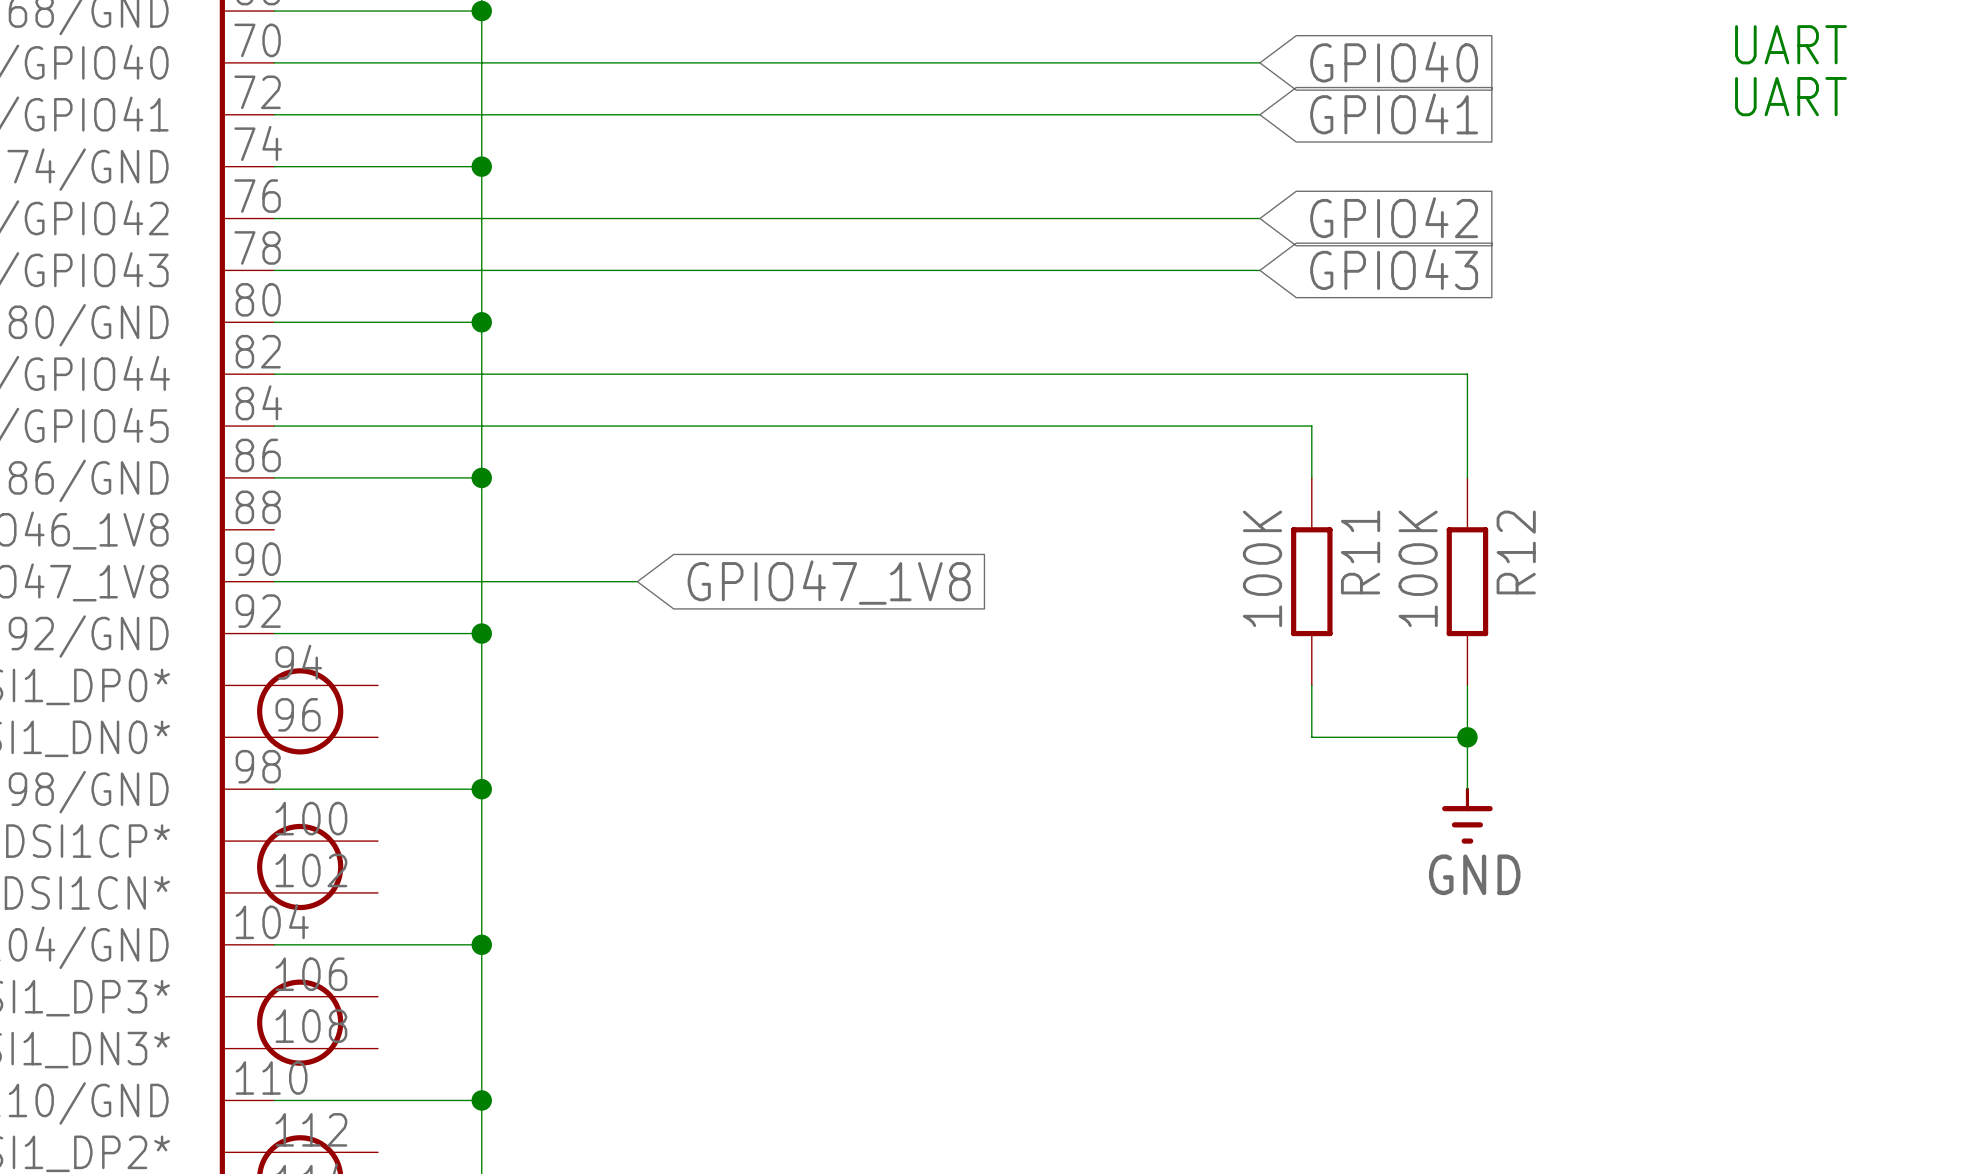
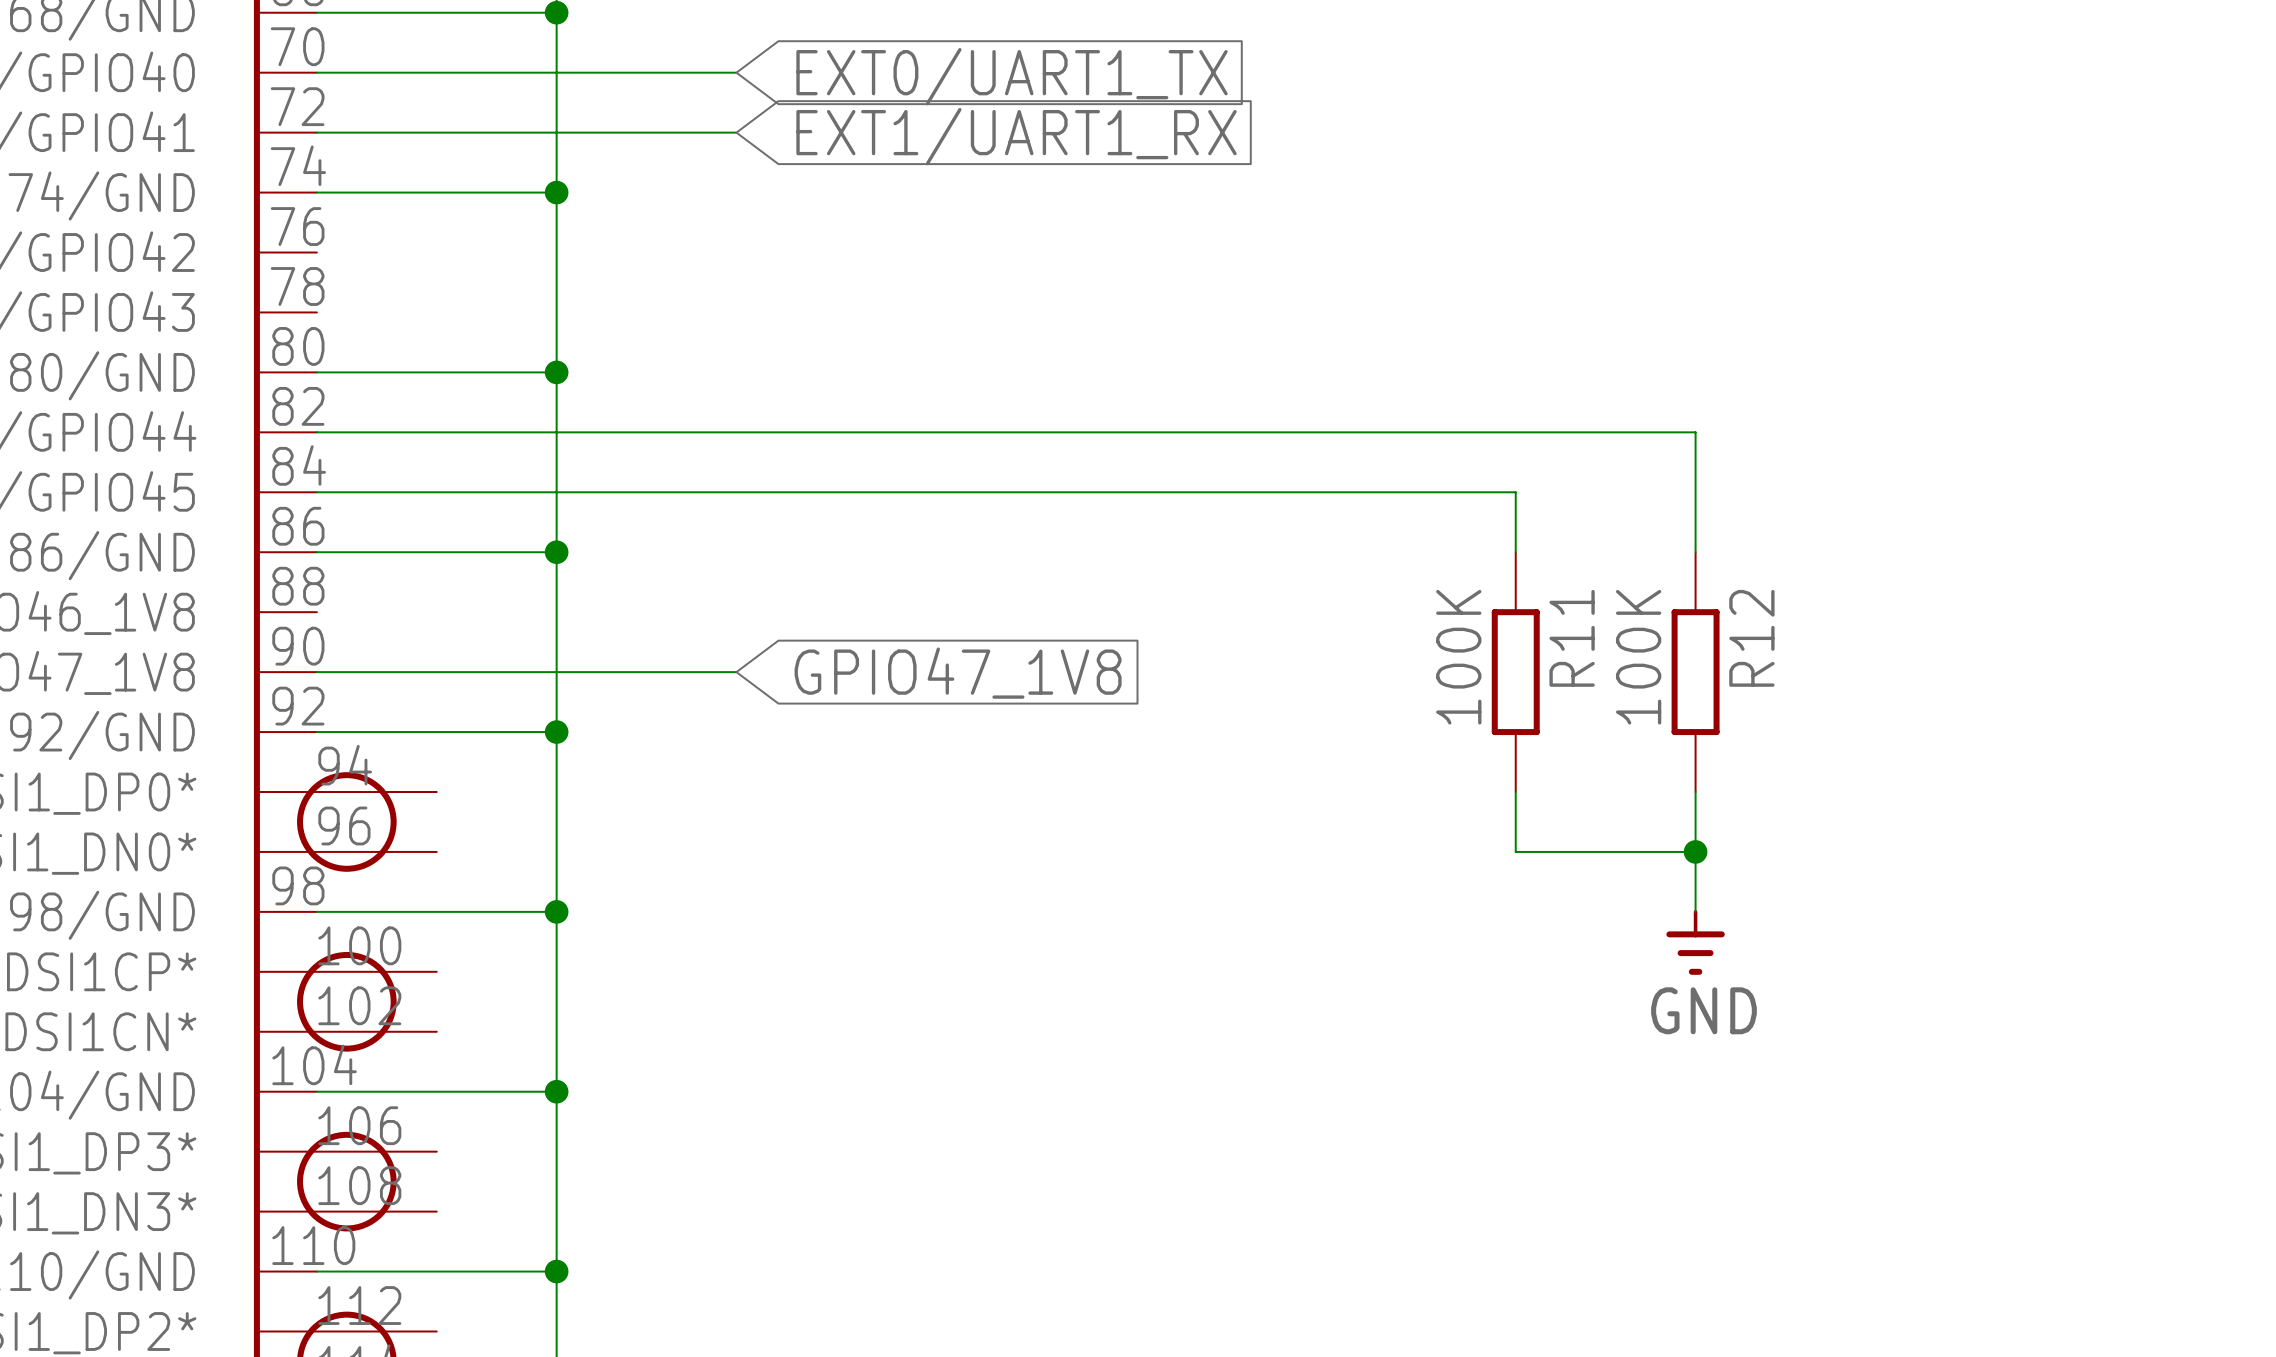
text: UART (1790, 44) -> none
wire: (637, 62) (1259, 62) -> none
global label: GPIO40 (1394, 62) -> none
global label: none -> EXT0/UART1_TX (1012, 76)
text: UART (1790, 96) -> none
global label: GPIO41 (1394, 113) -> none
wire: (637, 114) (1259, 114) -> none
global label: none -> EXT1/UART1_RX (1016, 136)
global label: GPIO42 (1394, 217) -> none
wire: (274, 218) (1259, 218) -> none
global label: GPIO43 (1394, 269) -> none
wire: (274, 270) (1259, 270) -> none

